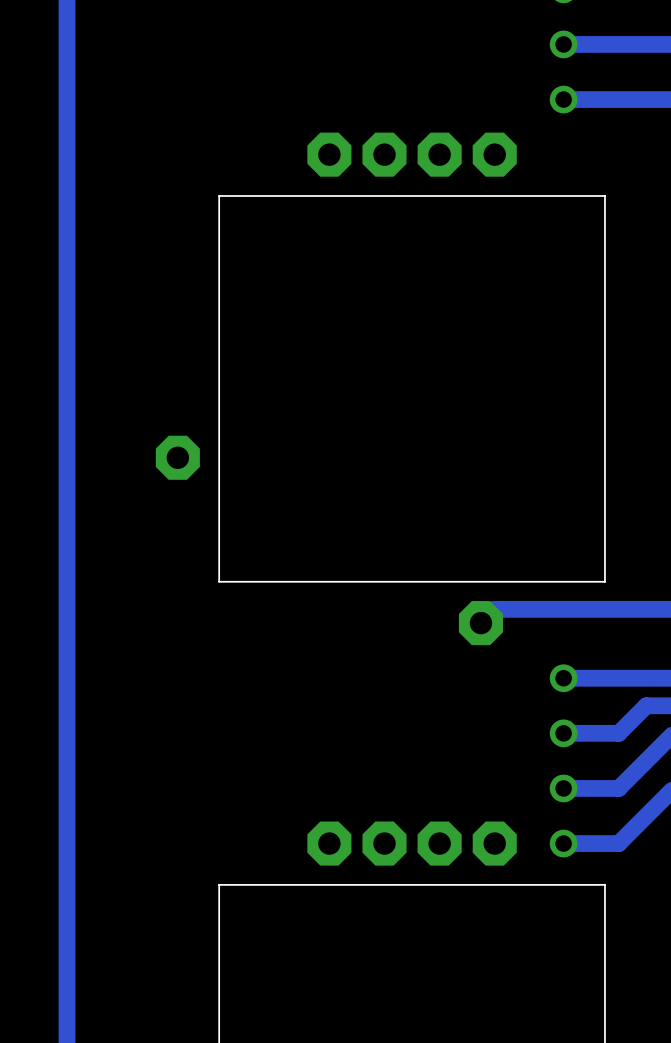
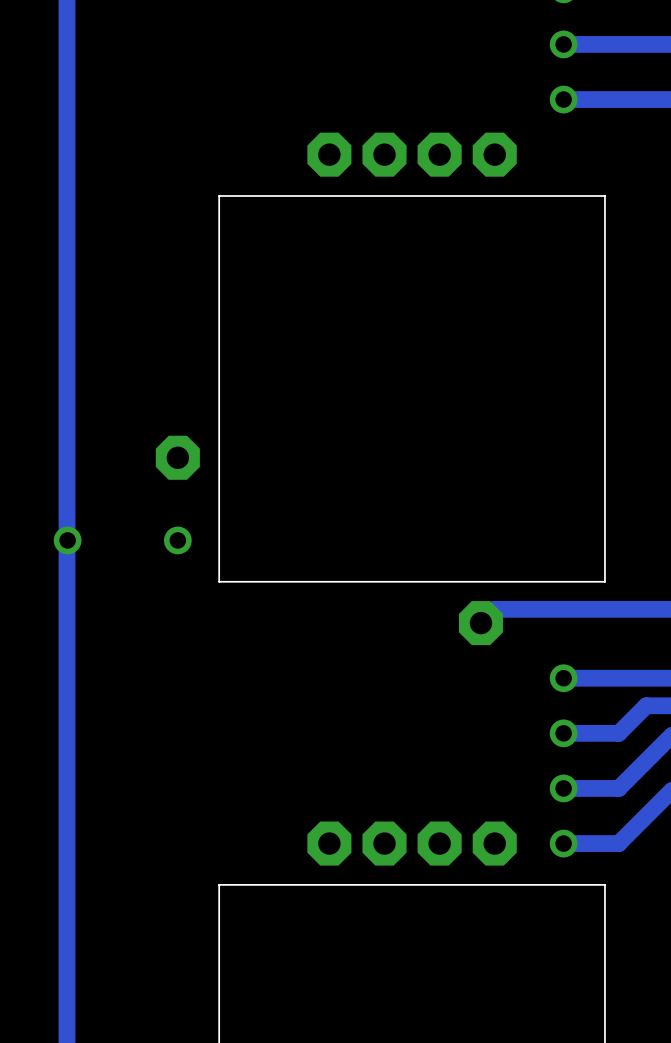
via: none -> (67, 540)
via: none -> (177, 540)

